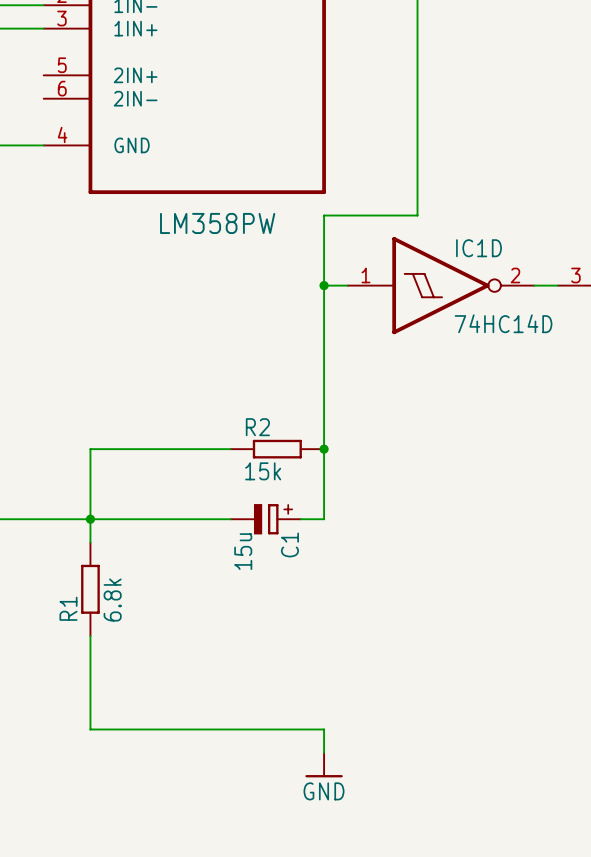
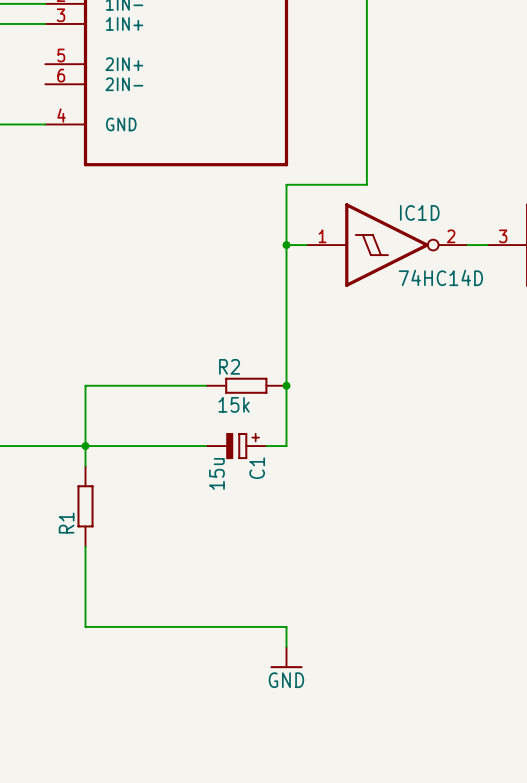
part value: LM358PW (217, 223) -> none
R1 value: 6.8k (112, 600) -> none

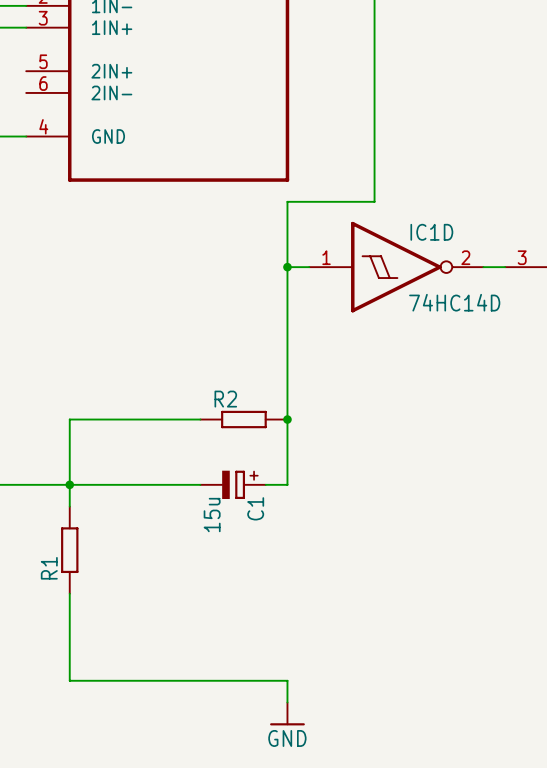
R2 value: 15k (234, 404) -> none

